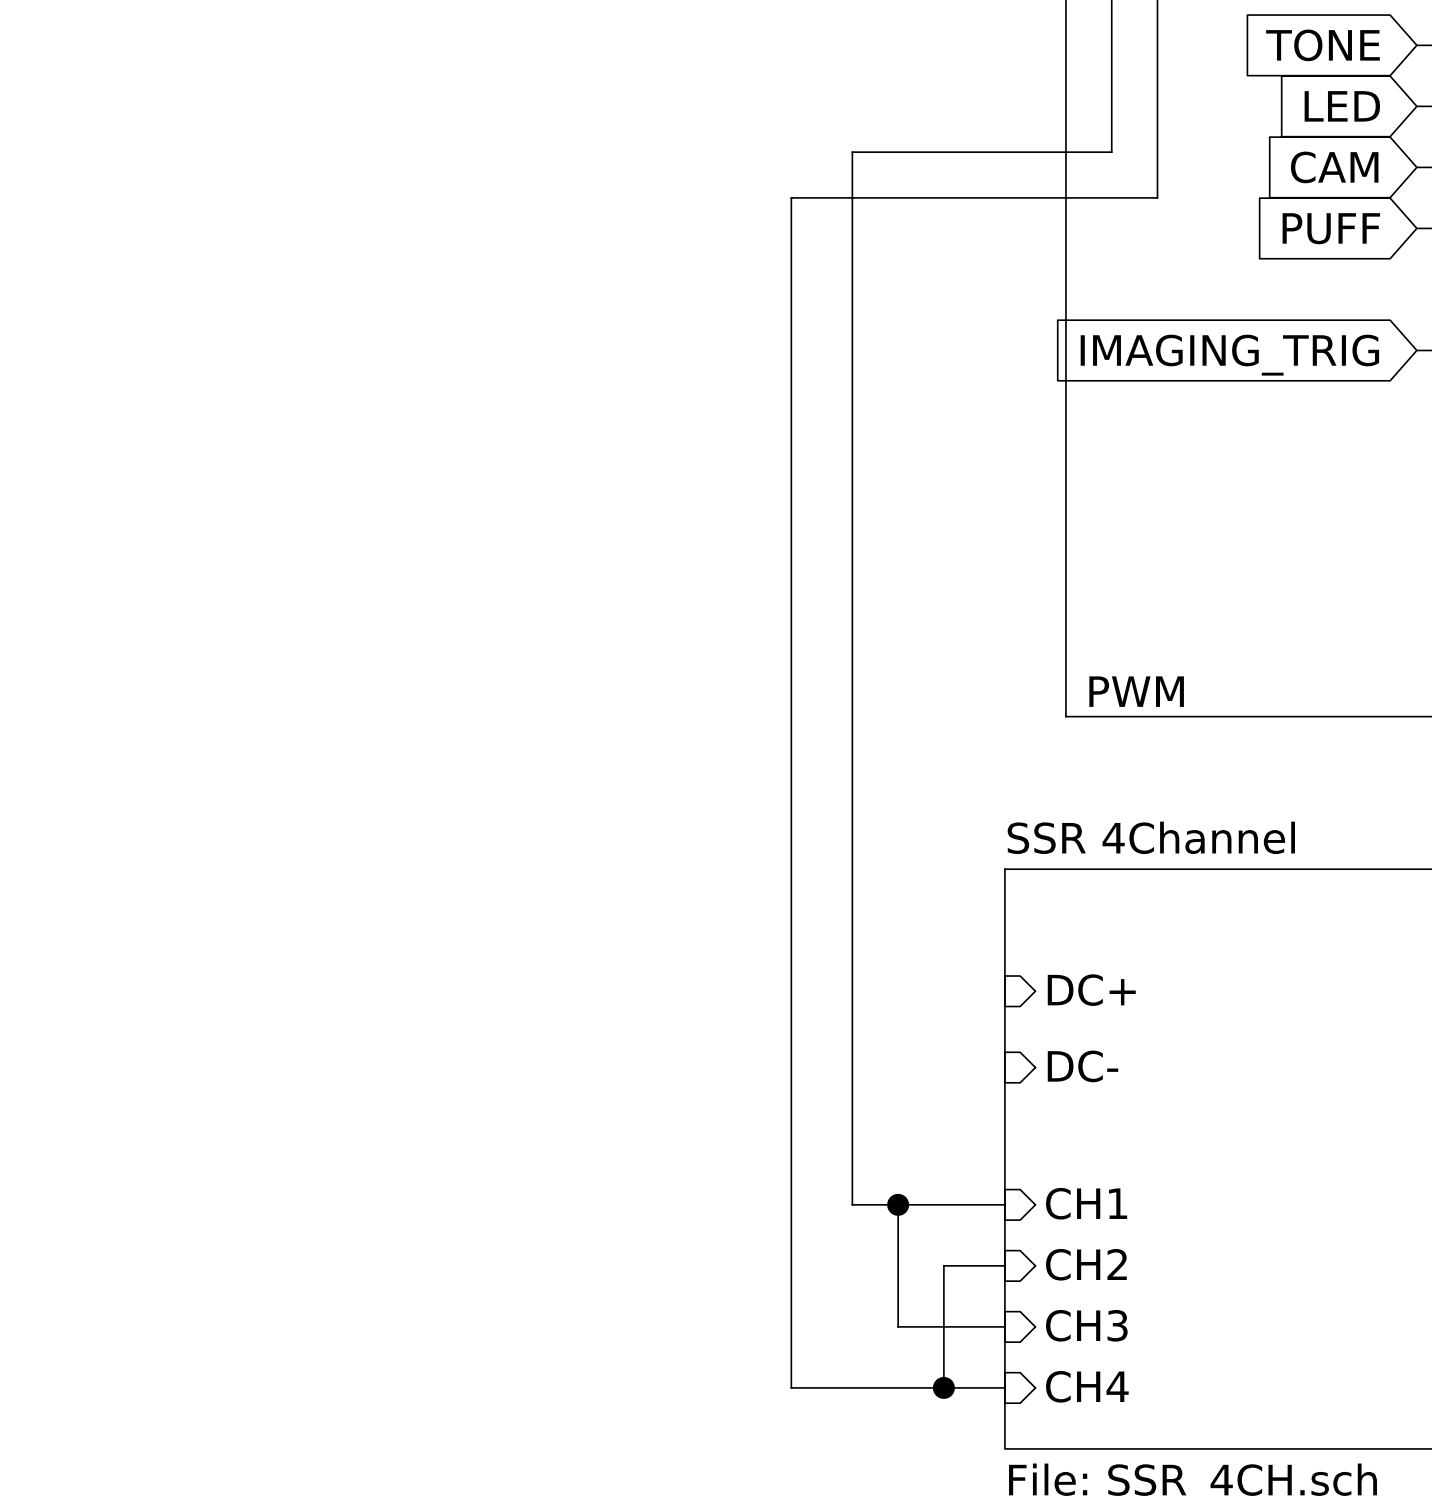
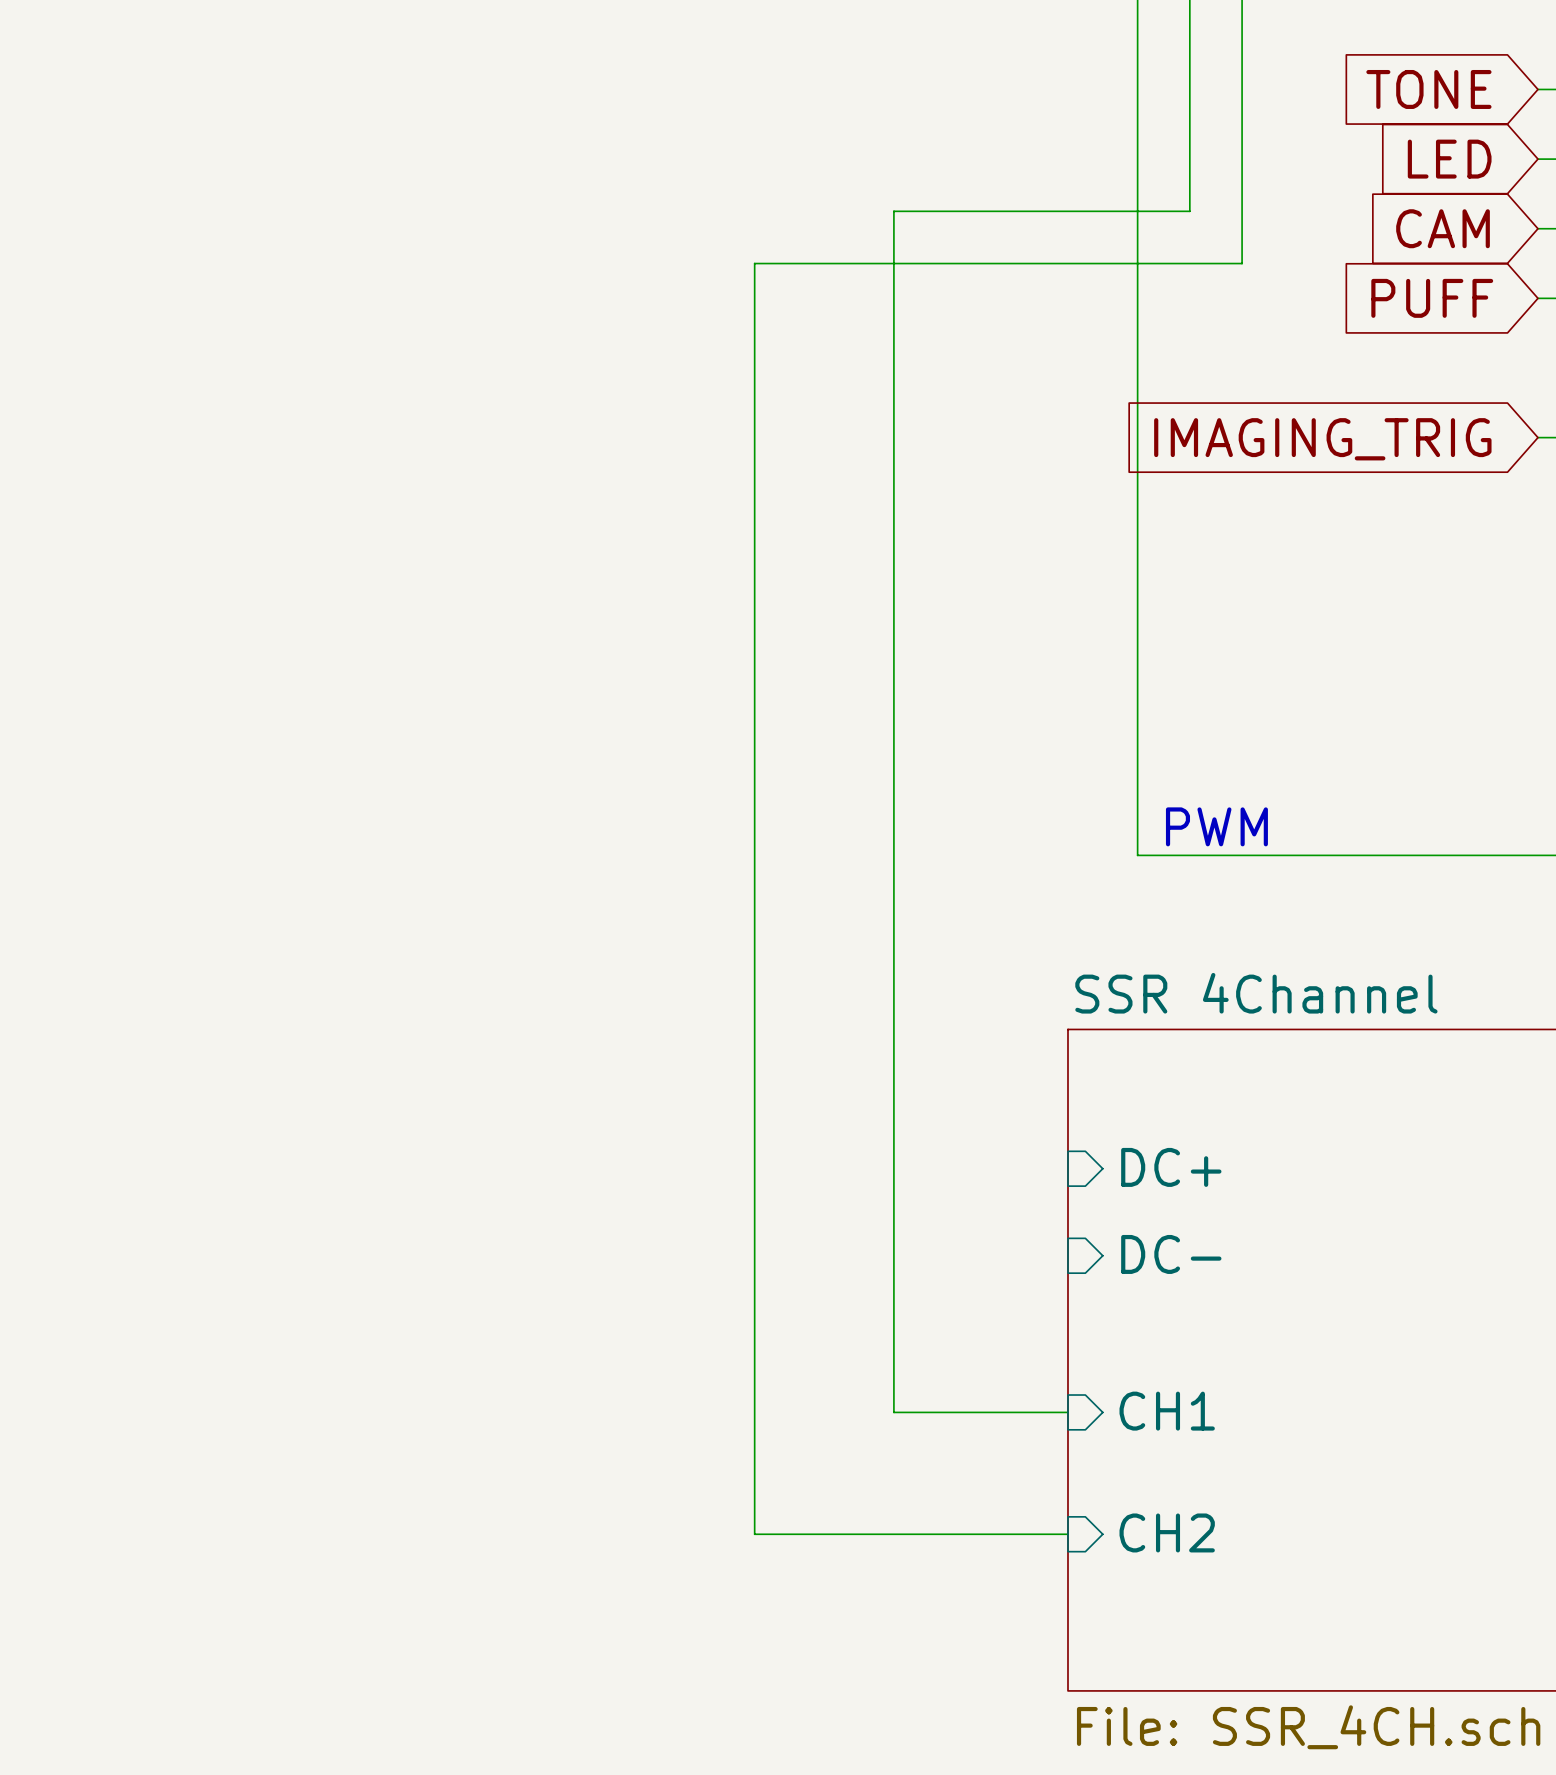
wire: (791, 197) (791, 1387) (1004, 1387) -> (824, 263) (754, 263) (754, 1534) (1067, 1534)
wire: (898, 1204) (898, 1326) (1004, 1326) -> none
junction: (898, 1204) -> none
sheet pin: CH2 (1086, 1264) -> none
wire: (1004, 1265) (943, 1265) (943, 1387) -> none
sheet pin: CH3 (1086, 1325) -> CH2 (1167, 1532)
sheet pin: CH4 (1087, 1386) -> none
junction: (943, 1387) -> none

